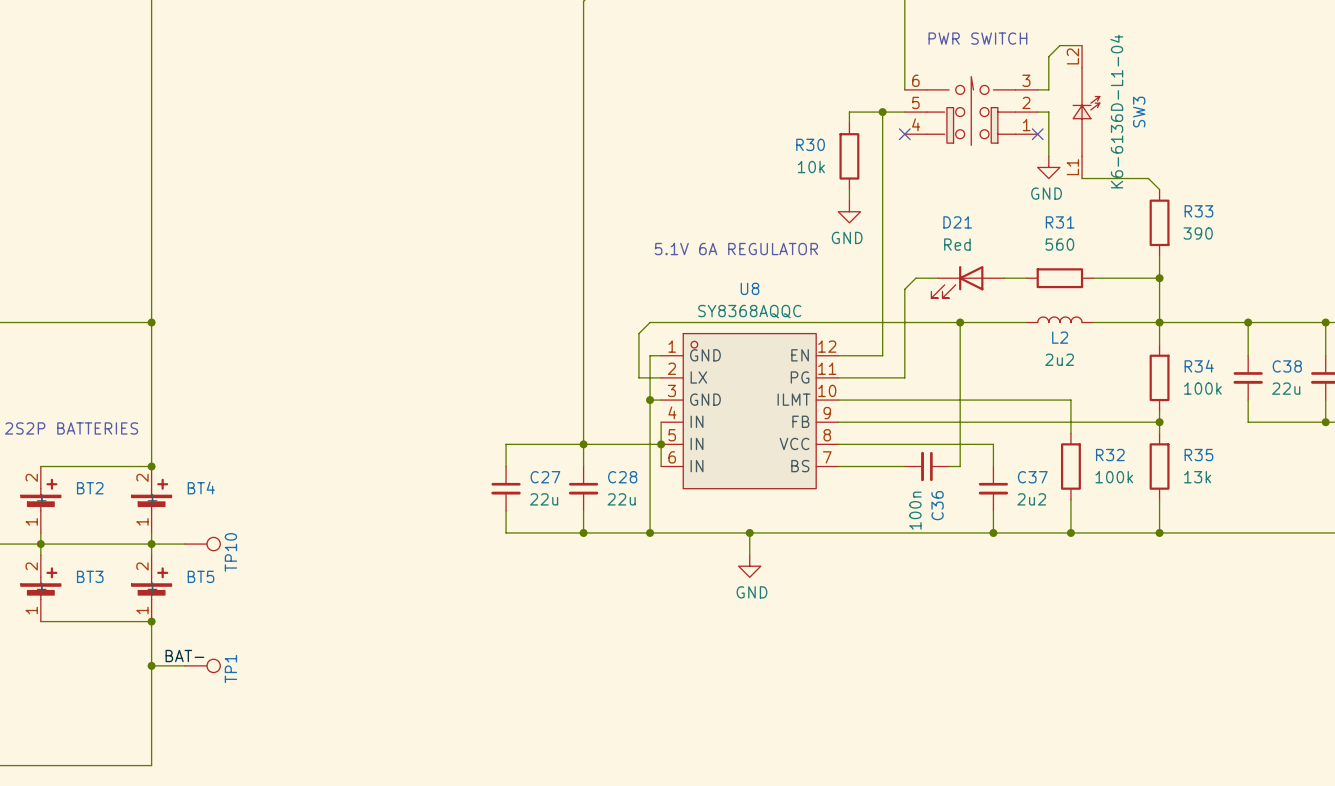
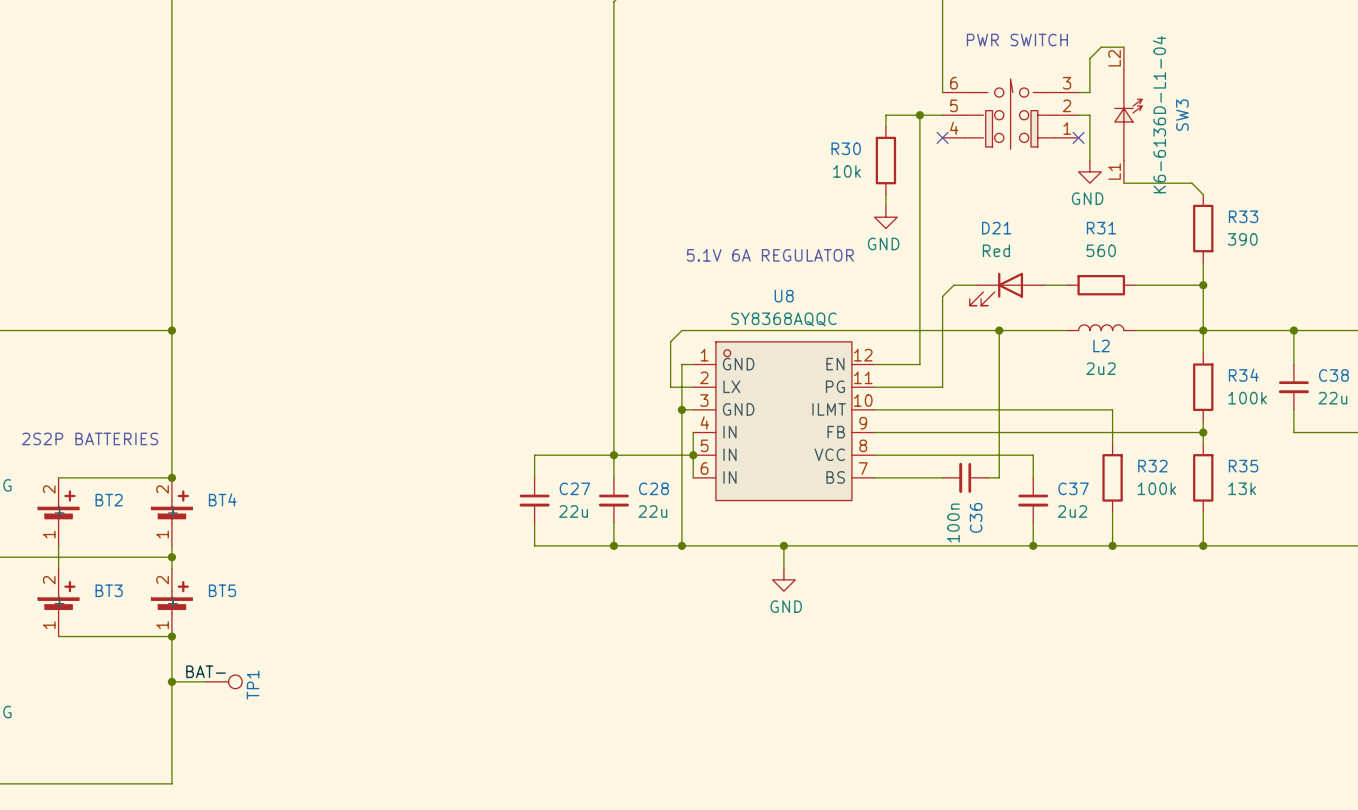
junction: (40, 544) -> none
wire: (151, 544) (184, 544) -> none
TP10: (202, 544) -> none

